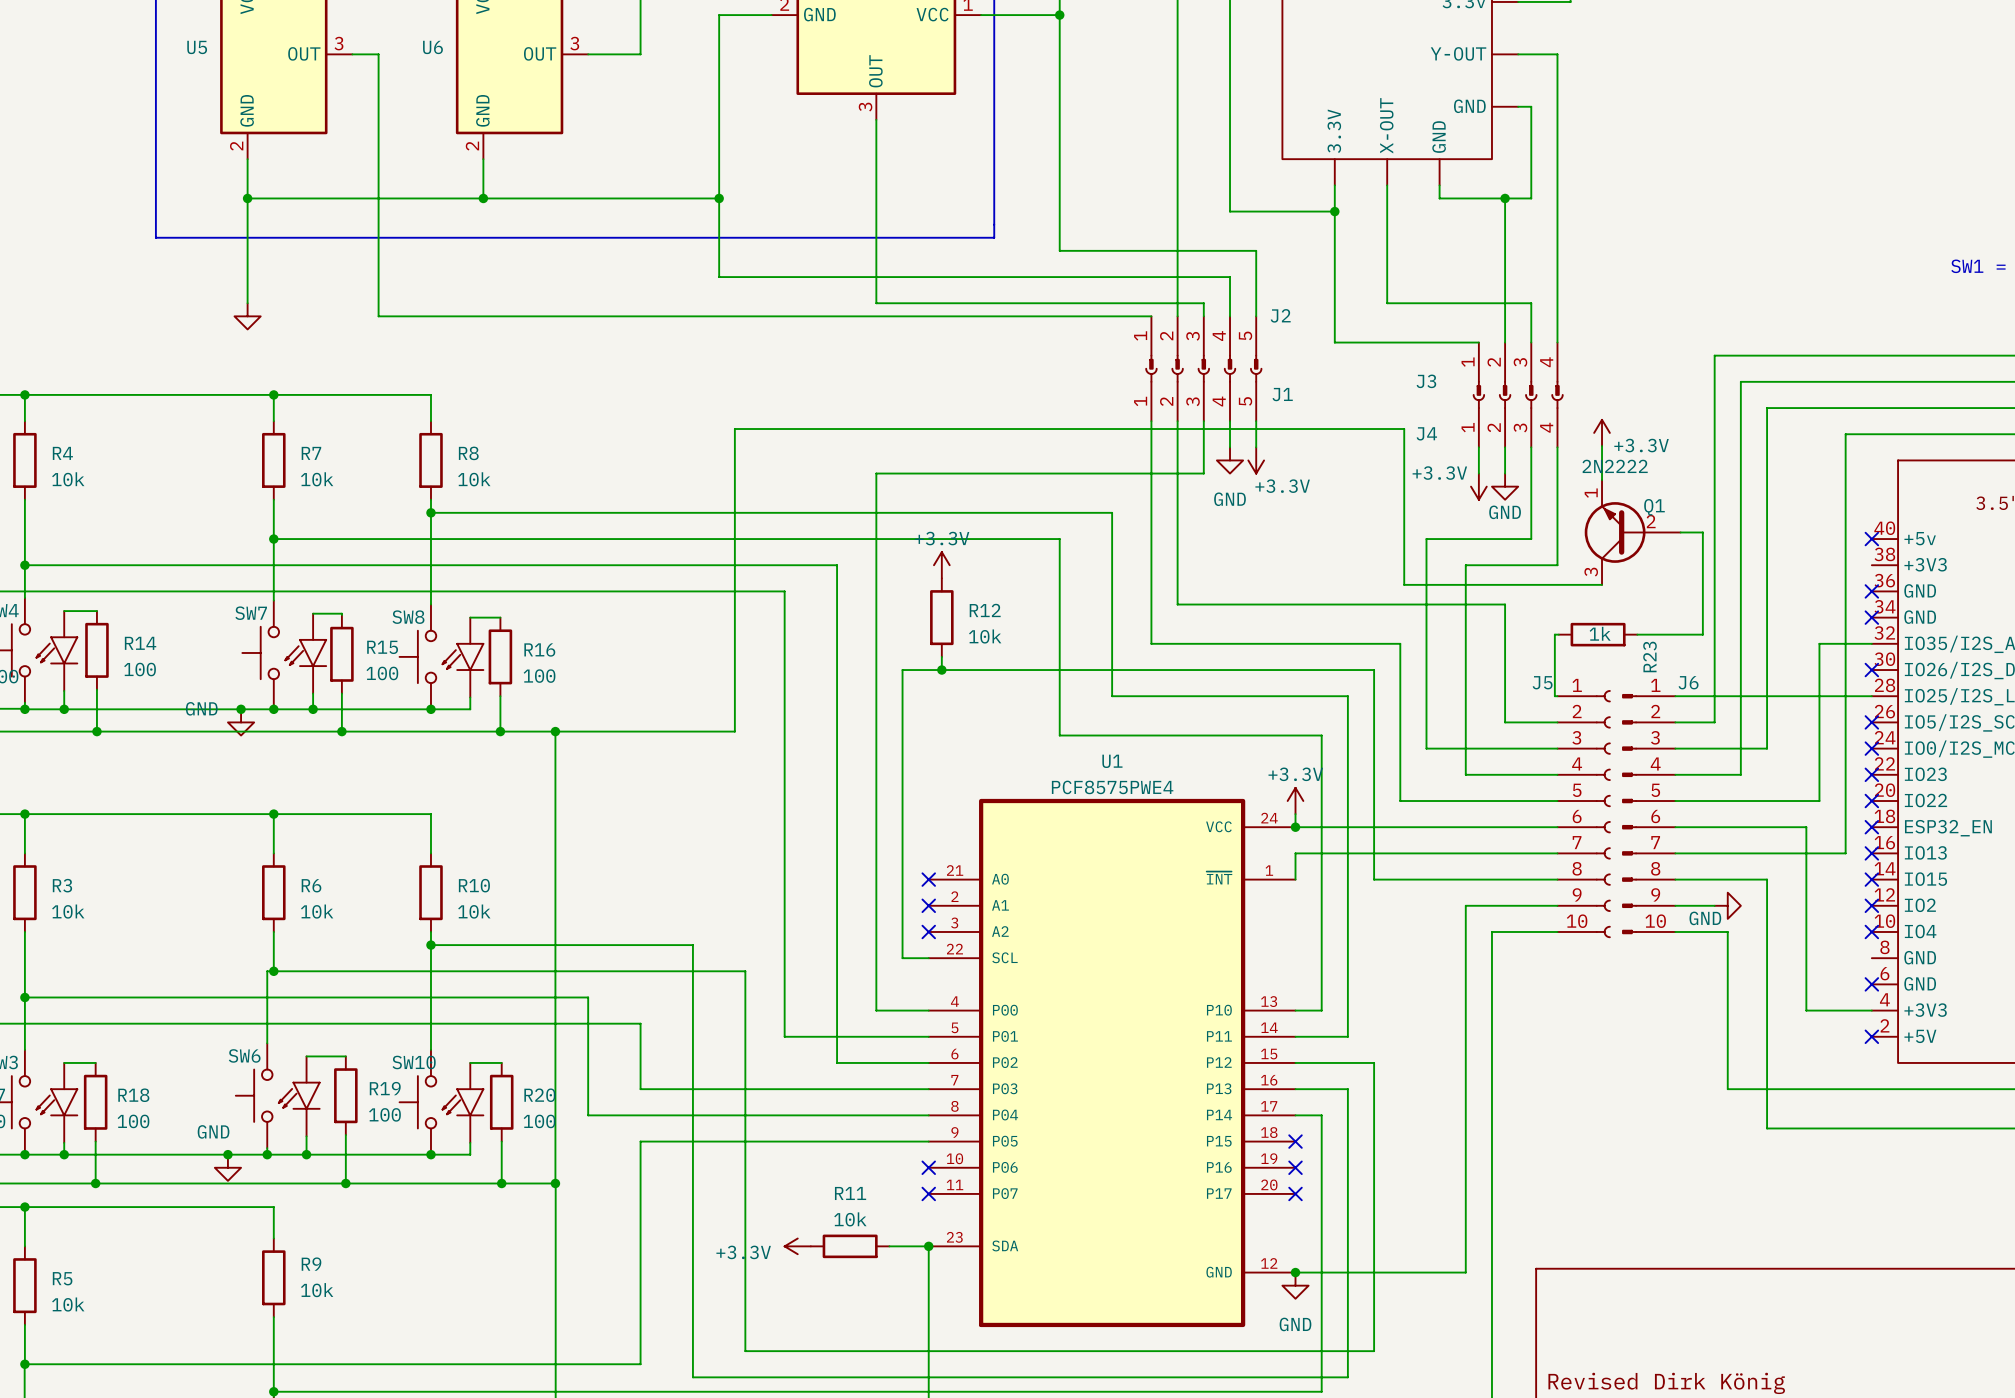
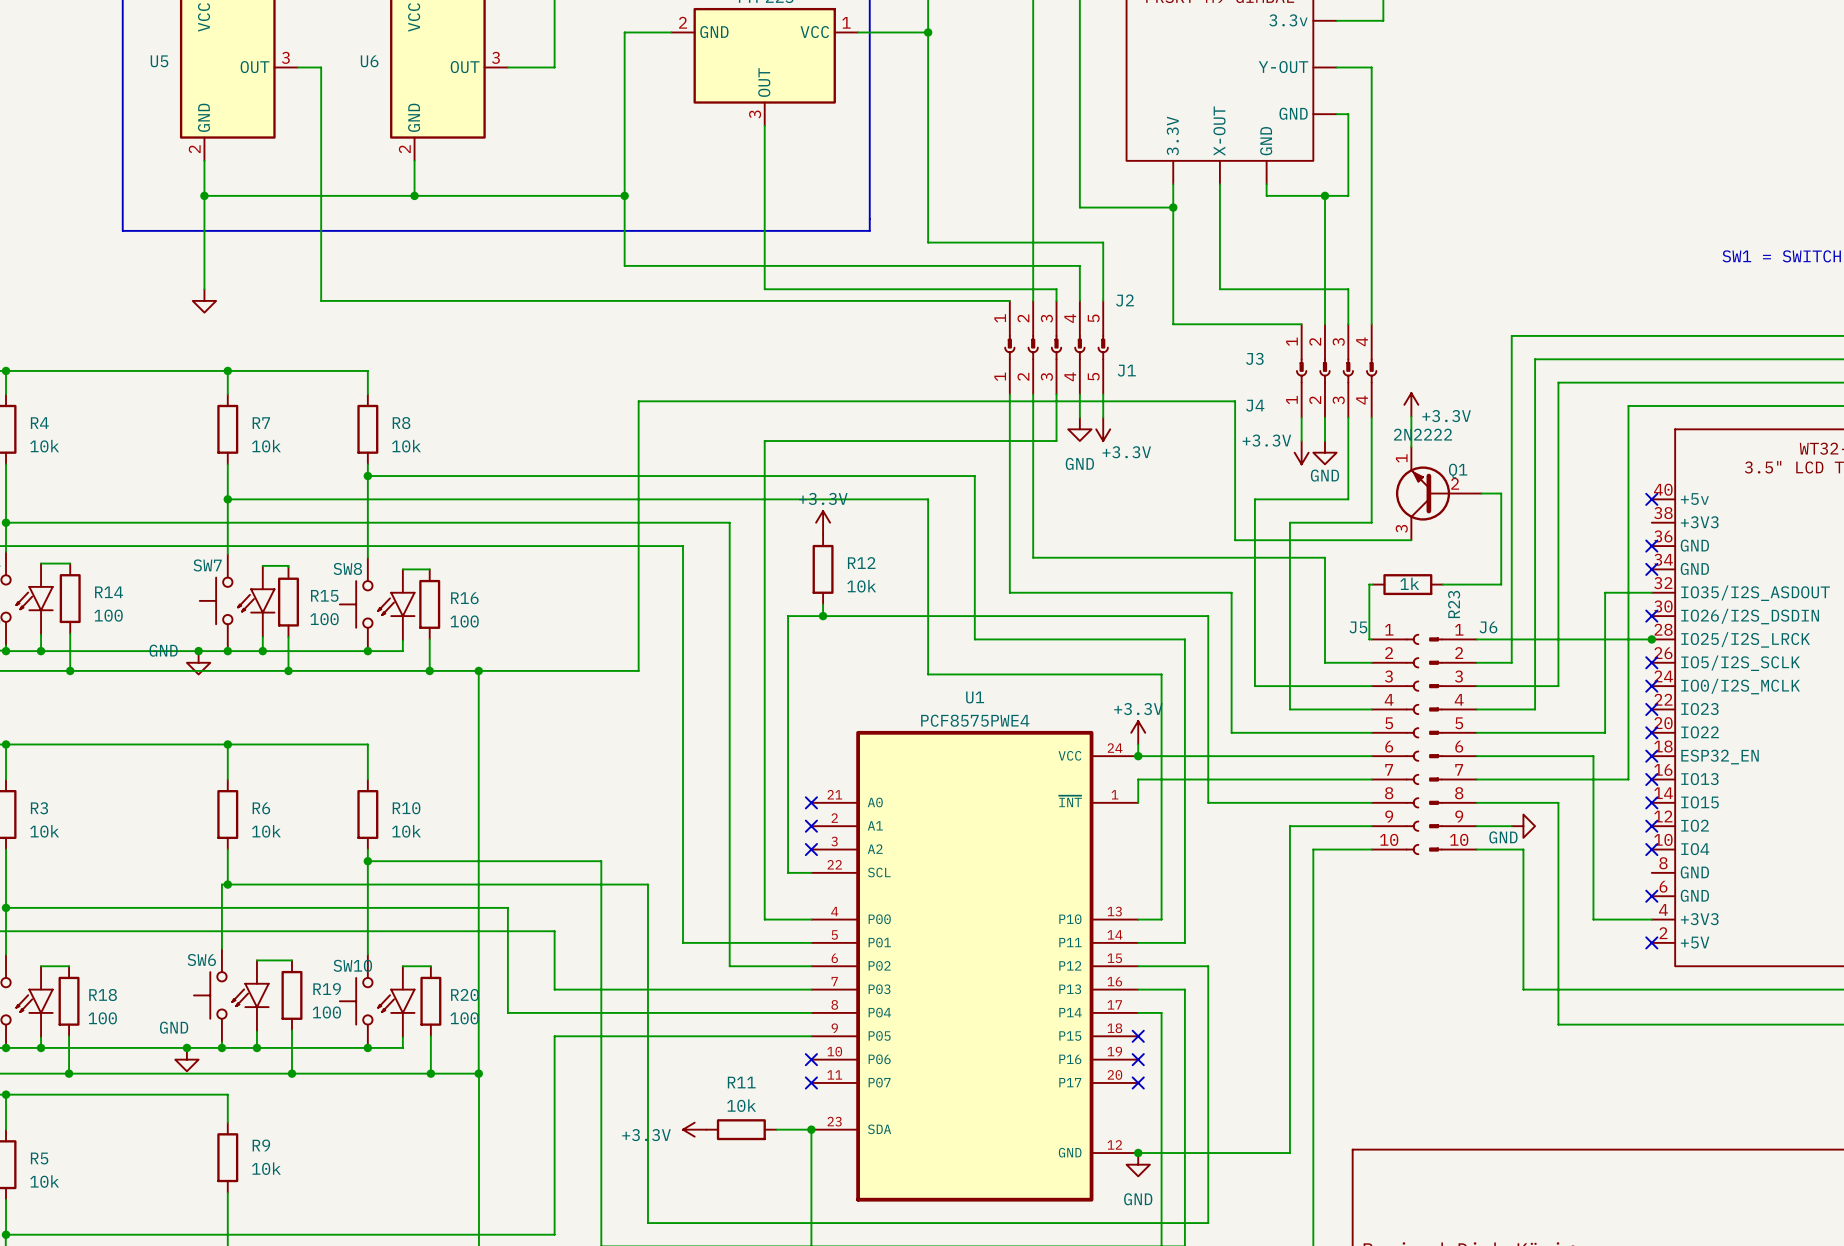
junction: none -> (1651, 639)

